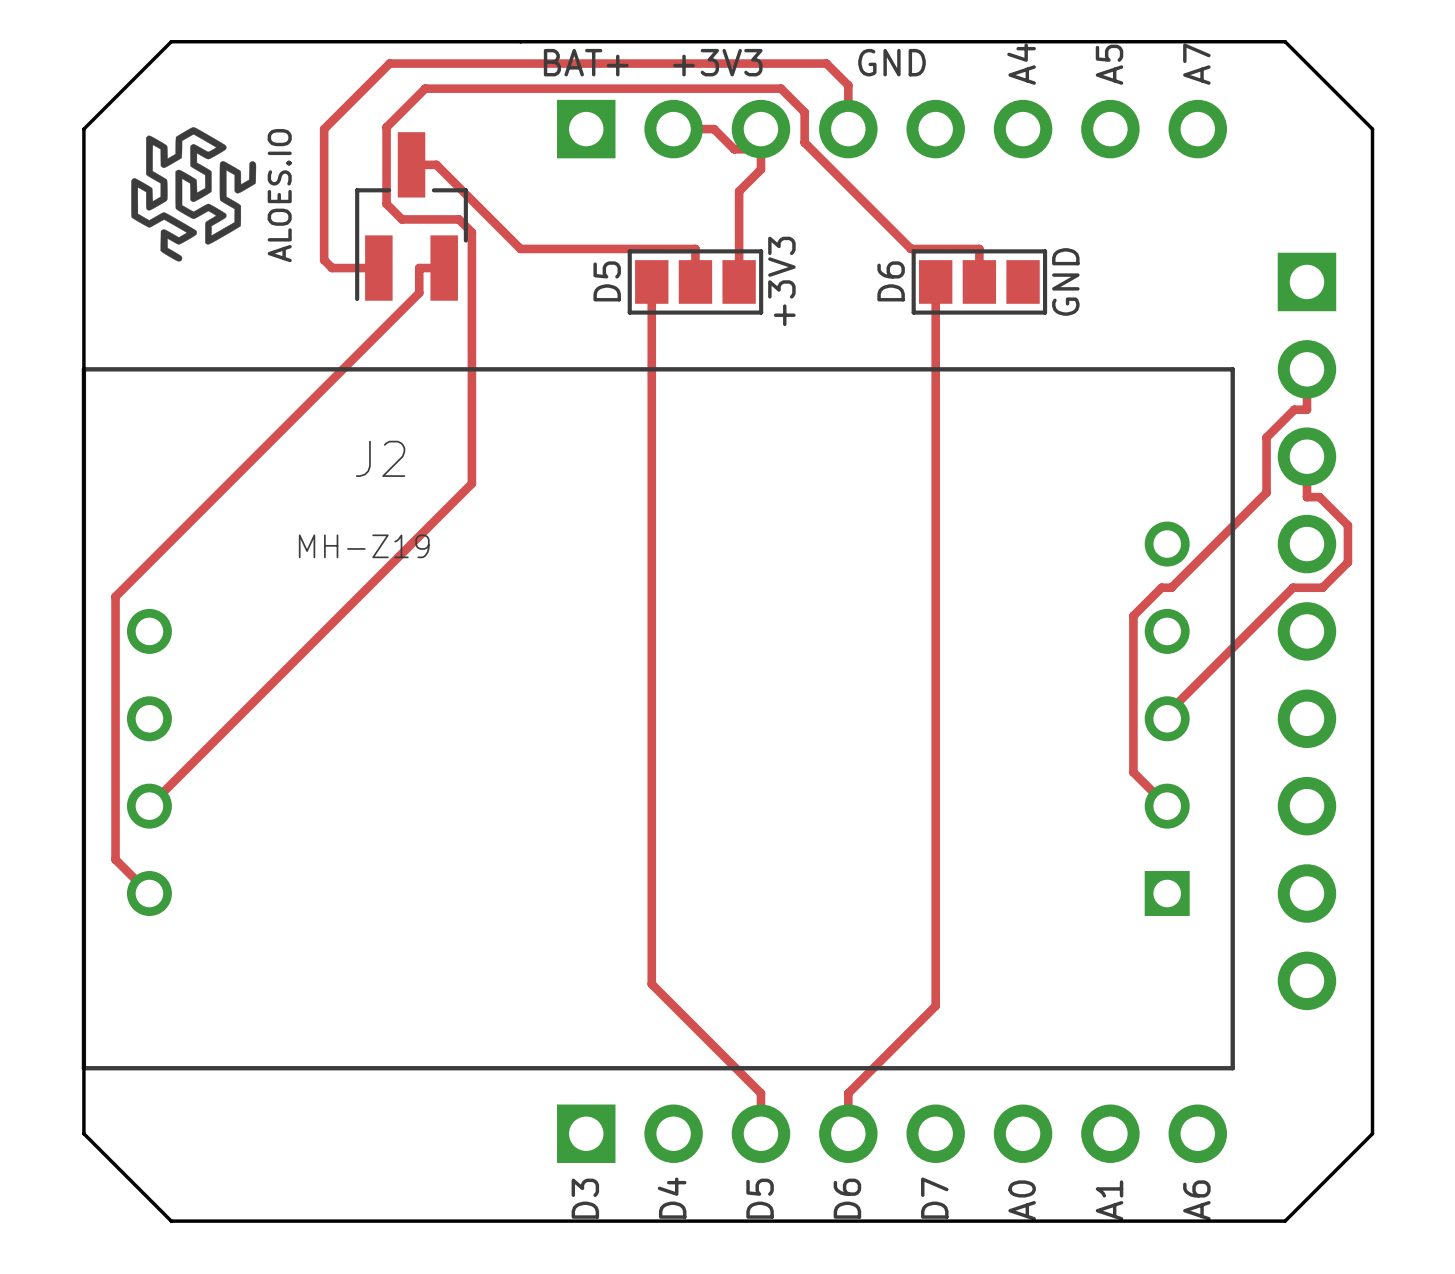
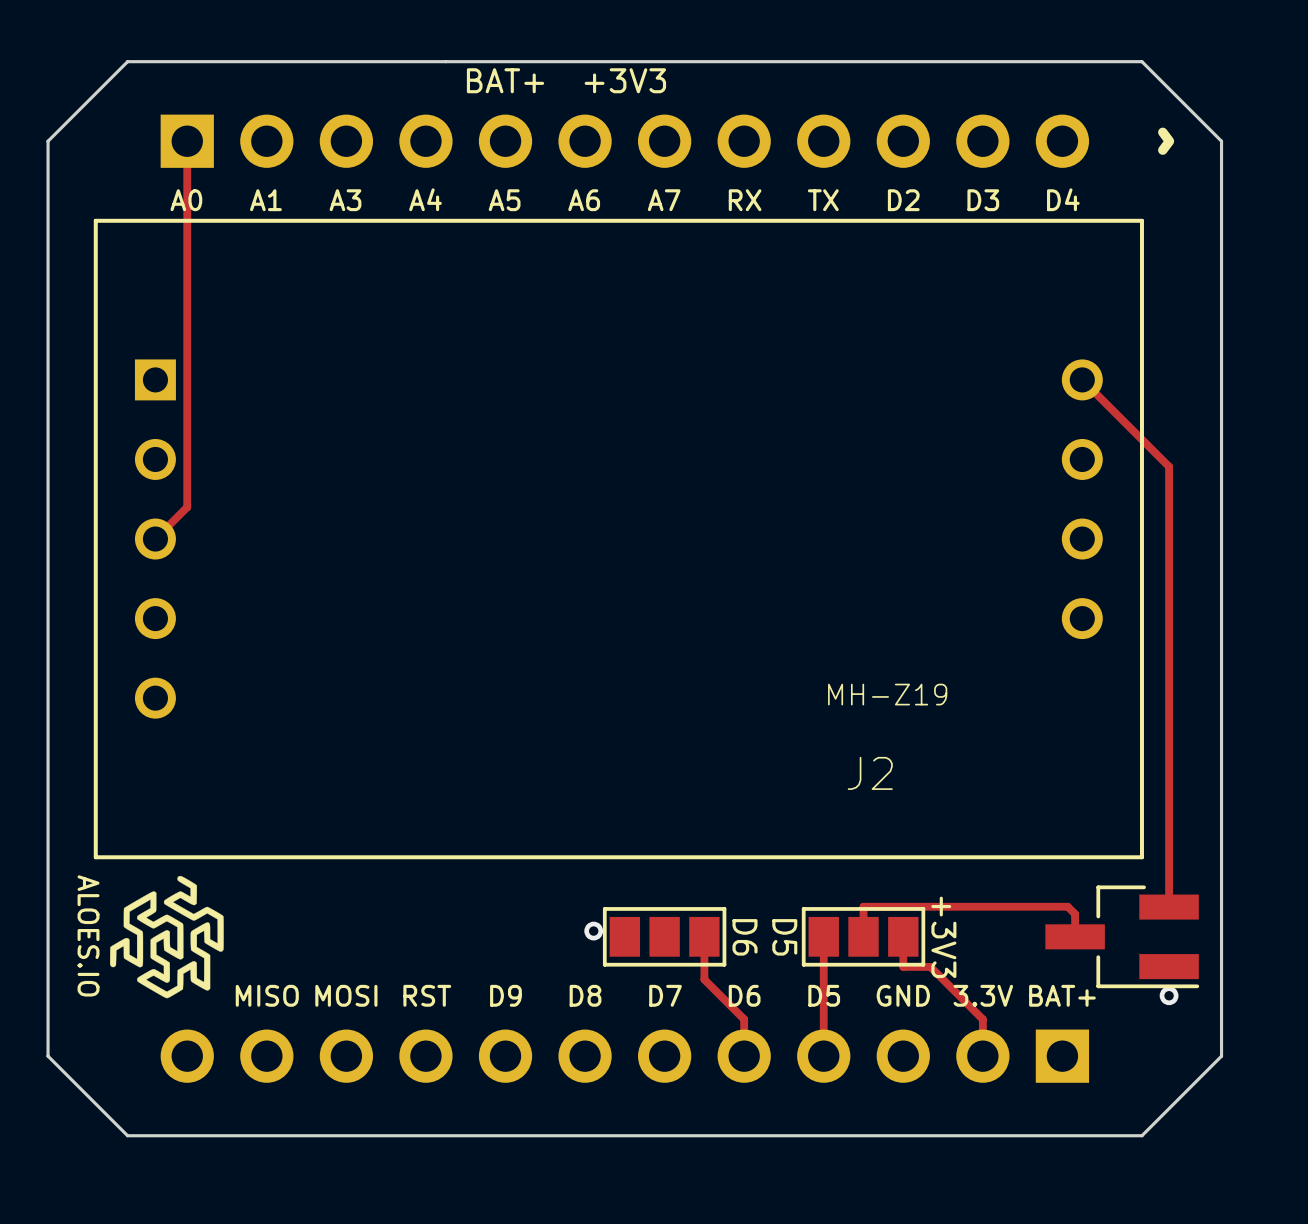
text: GND (892, 62) -> none
text rotation: 0° (1021, 64) -> 90° clockwise (425, 199)
text position: A4 (1021, 64) -> A4 (425, 199)
text rotation: 0° (1109, 64) -> 90° clockwise (504, 200)
text position: A5 (1109, 64) -> A5 (504, 200)
text rotation: 0° (1196, 64) -> 90° clockwise (664, 200)
text position: A7 (1196, 64) -> A7 (664, 200)
drawing: [131, 127, 257, 262] -> none
track: none -> (187, 141) (187, 507) (155, 539)
track: (673, 129) (714, 129) (734, 149) (760, 149) -> none
part: none -> (624, 141)
track: (760, 129) (760, 169) (739, 191) (739, 281) -> none
track: (848, 129) (848, 85) (826, 63) (389, 63) (324, 129) (324, 260) (332, 268) (378, 268) -> none
part: (892, 129) -> none
text: none -> ^ (1166, 141)
track: (411, 164) (436, 164) (520, 248) (695, 248) (695, 281) -> none
text: none -> A0 (186, 200)
text: none -> A1 (265, 200)
text: none -> A3 (345, 200)
text: none -> A6 (584, 200)
text: none -> RX (745, 200)
text: none -> TX (823, 200)
text: none -> D2 (903, 200)
text: none -> D3 (983, 200)
text: none -> D4 (1063, 199)
text rotation: 0° (279, 195) -> 180° (88, 935)
text position: ALOES.IO (279, 195) -> ALOES.IO (88, 935)
part: (411, 216) -> none
track: (444, 268) (419, 268) (419, 292) (115, 596) (115, 859) (149, 893) -> none
text: D5 (607, 281) -> none
track: (651, 281) (651, 984) (760, 1093) (760, 1133) -> none
part: (695, 281) -> none
text rotation: 0° (781, 281) -> 180° (943, 937)
text position: +3V3 (781, 281) -> +3V3 (943, 937)
text: D6 (891, 281) -> none
track: (935, 281) (935, 1002) -> none
track: (979, 281) (979, 248) (910, 248) (804, 142) (804, 112) (781, 88) (425, 88) (386, 127) (386, 203) (402, 219) (458, 219) (471, 232) (471, 483) (149, 806) -> none
part: (979, 281) -> none
text: GND (1065, 281) -> none
track: (1306, 369) (1306, 409) (1294, 409) (1266, 437) (1266, 492) (1171, 587) (1161, 587) (1133, 615) (1133, 772) (1167, 806) -> none
track: none -> (1082, 379) (1169, 466) (1169, 907)
track: (1306, 456) (1306, 497) (1319, 497) (1347, 525) (1347, 562) (1322, 587) (1293, 587) (1167, 713) (1167, 718) -> none
part: (1306, 631) -> none
J2 rotation: 0° (658, 718) -> 180° (618, 539)
drawing: none -> [109, 875, 224, 999]
via: none -> (593, 931)
part: none -> (664, 936)
track: none -> (704, 936) (704, 979) (744, 1019)
track: none -> (863, 936) (863, 906) (1067, 906) (1075, 914) (1075, 936)
part: none -> (863, 936)
track: none -> (903, 936) (903, 966) (930, 966) (982, 1019) (982, 1056)
part: none -> (1122, 936)
text: none -> D6 (745, 937)
text: none -> D5 (784, 937)
track: (935, 1005) (848, 1093) -> (823, 939) (823, 1056)
text: none -> MISO (267, 995)
text: none -> MOSI (346, 995)
text: none -> RST (427, 995)
text: none -> D9 (505, 995)
text: none -> D8 (585, 995)
text: none -> D6 (744, 995)
text: none -> D5 (824, 995)
text: none -> GND (903, 995)
text: none -> 3.3V (983, 995)
text: none -> BAT+ (1062, 995)
via: none -> (1169, 995)
part: none -> (624, 1056)
part: (892, 1133) -> none
text: D3 (585, 1198) -> none
text: D4 (672, 1198) -> none
text: D5 (760, 1198) -> none
text: D6 (847, 1198) -> none
text rotation: 0° (934, 1198) -> 90° clockwise (665, 995)
text position: D7 (934, 1198) -> D7 (665, 995)
text: A0 (1022, 1200) -> none
text: A1 (1109, 1200) -> none
text: A6 (1196, 1200) -> none

